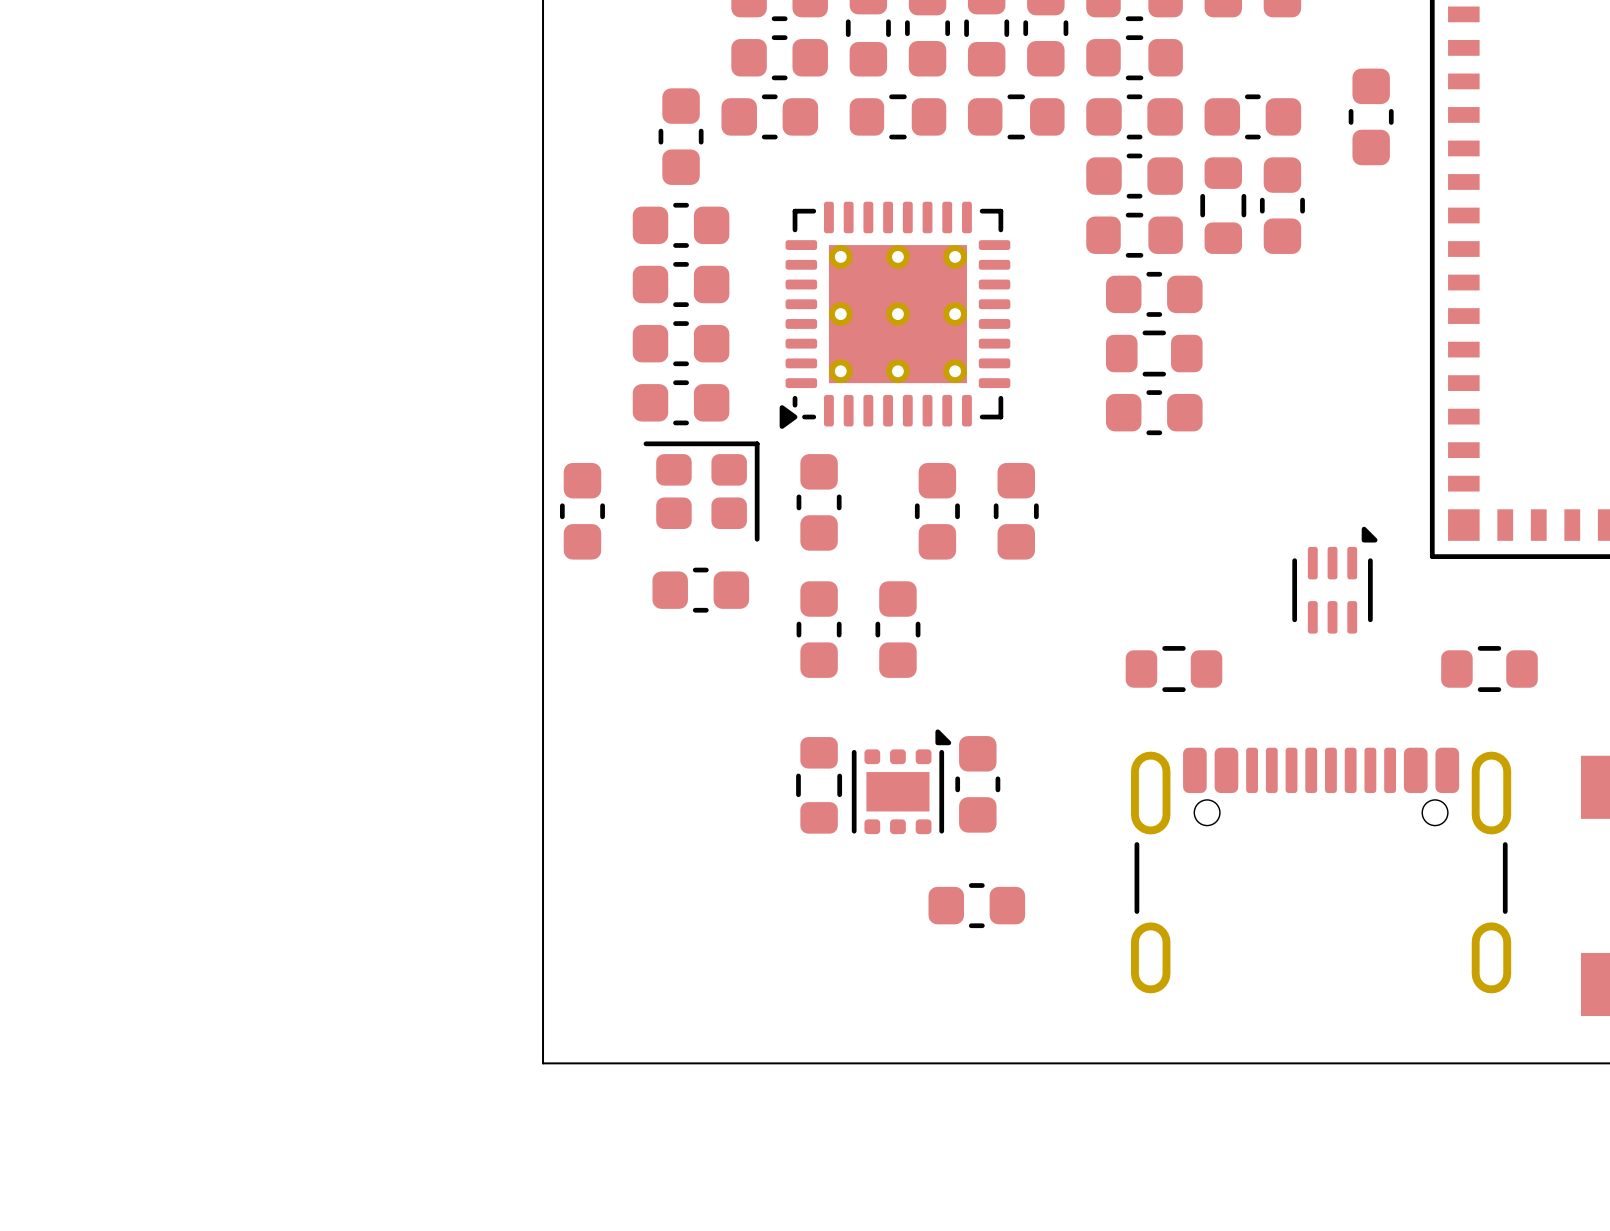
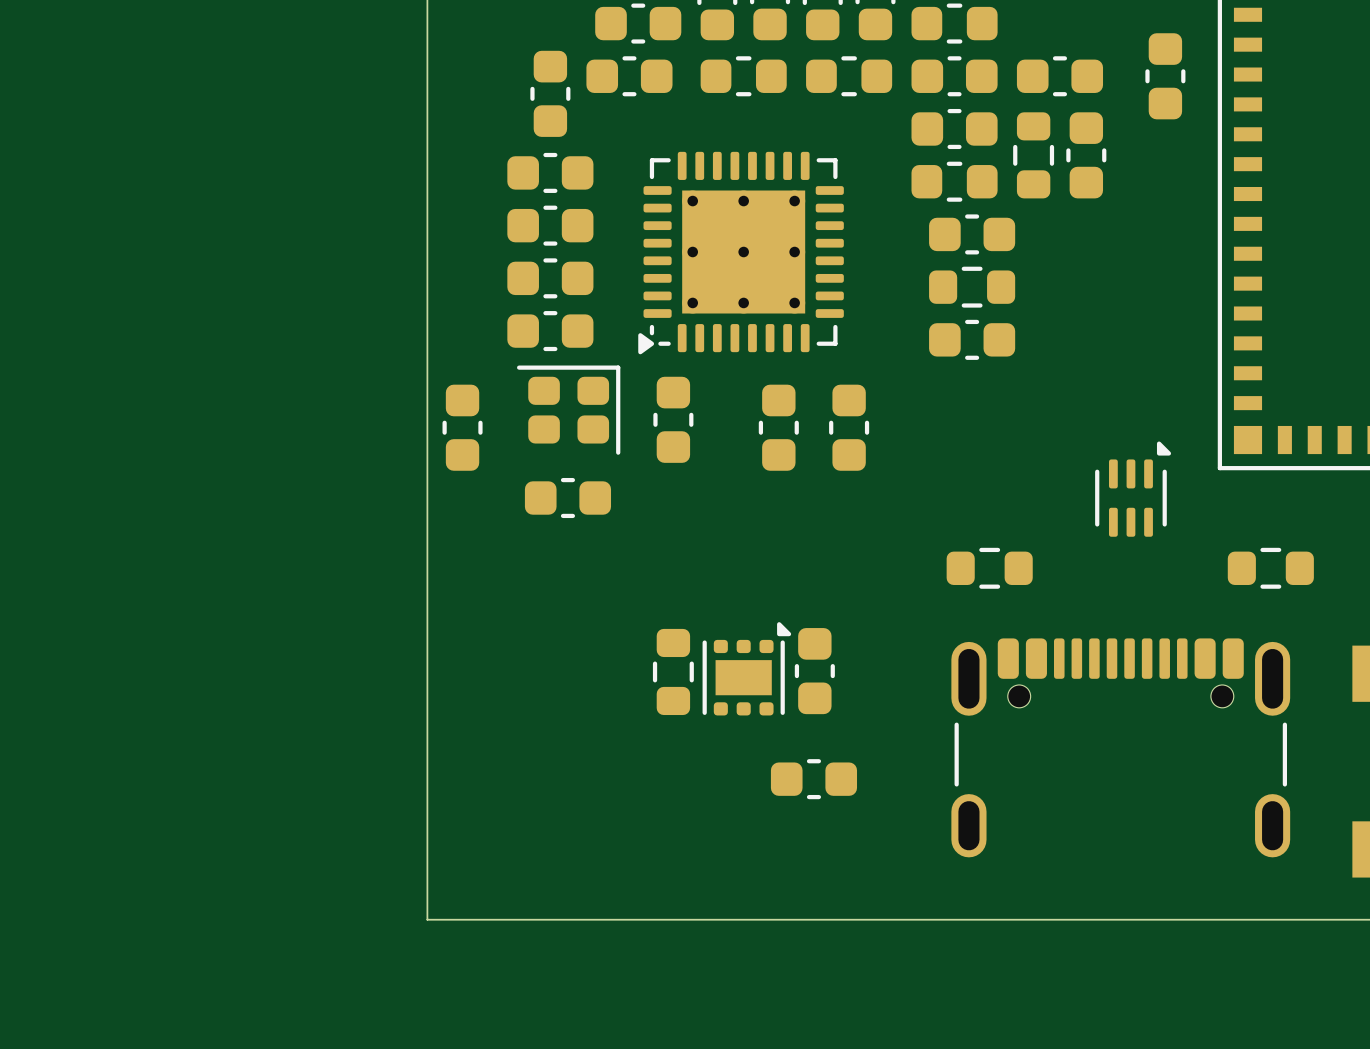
part: (819, 629) -> none
part: (897, 629) -> none

